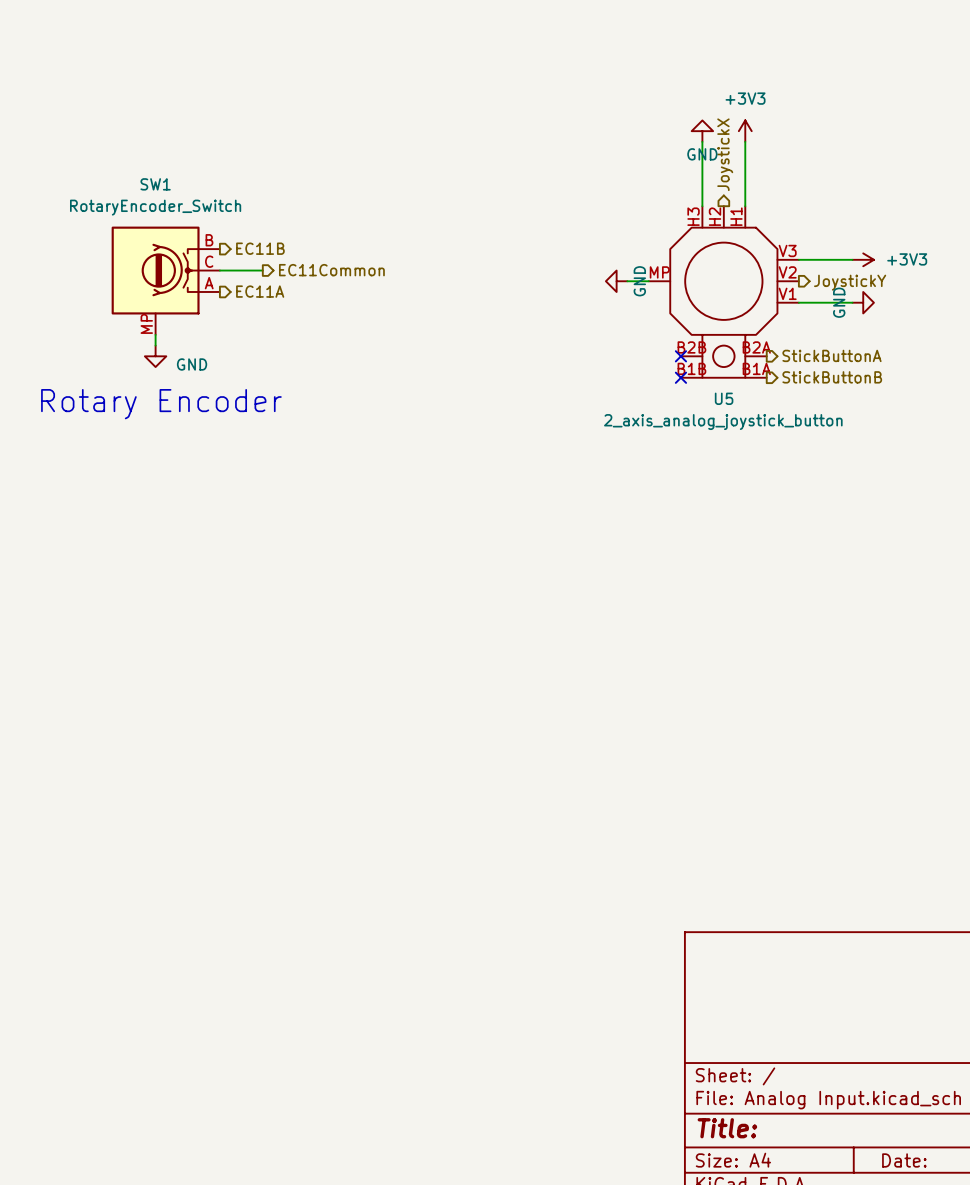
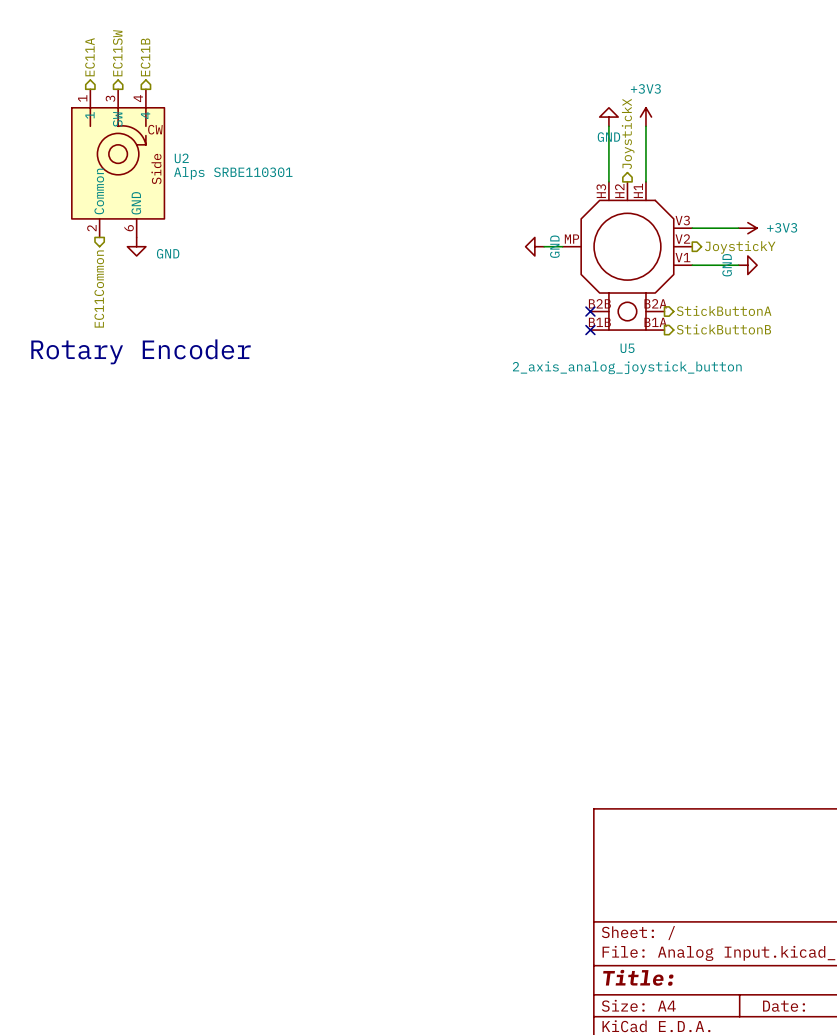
hierarchical label: none -> EC11SW (117, 53)
hierarchical label: none -> EC11A (90, 57)
U2: none -> Alps SRBE110301 (118, 163)
hierarchical label rotation: 0° (260, 248) -> 90° counterclockwise (145, 57)
hierarchical label position: EC11B (260, 248) -> EC11B (145, 57)
wire: (219, 270) (262, 270) -> none
hierarchical label rotation: 0° (331, 270) -> 90° clockwise (99, 289)
hierarchical label position: EC11Common (331, 270) -> EC11Common (99, 289)
SW1: RotaryEncoder_Switch (165, 280) -> none
hierarchical label: EC11A (260, 291) -> none
wire: (155, 334) (155, 345) -> none
power symbol position: GND (155, 356) -> GND (136, 246)

